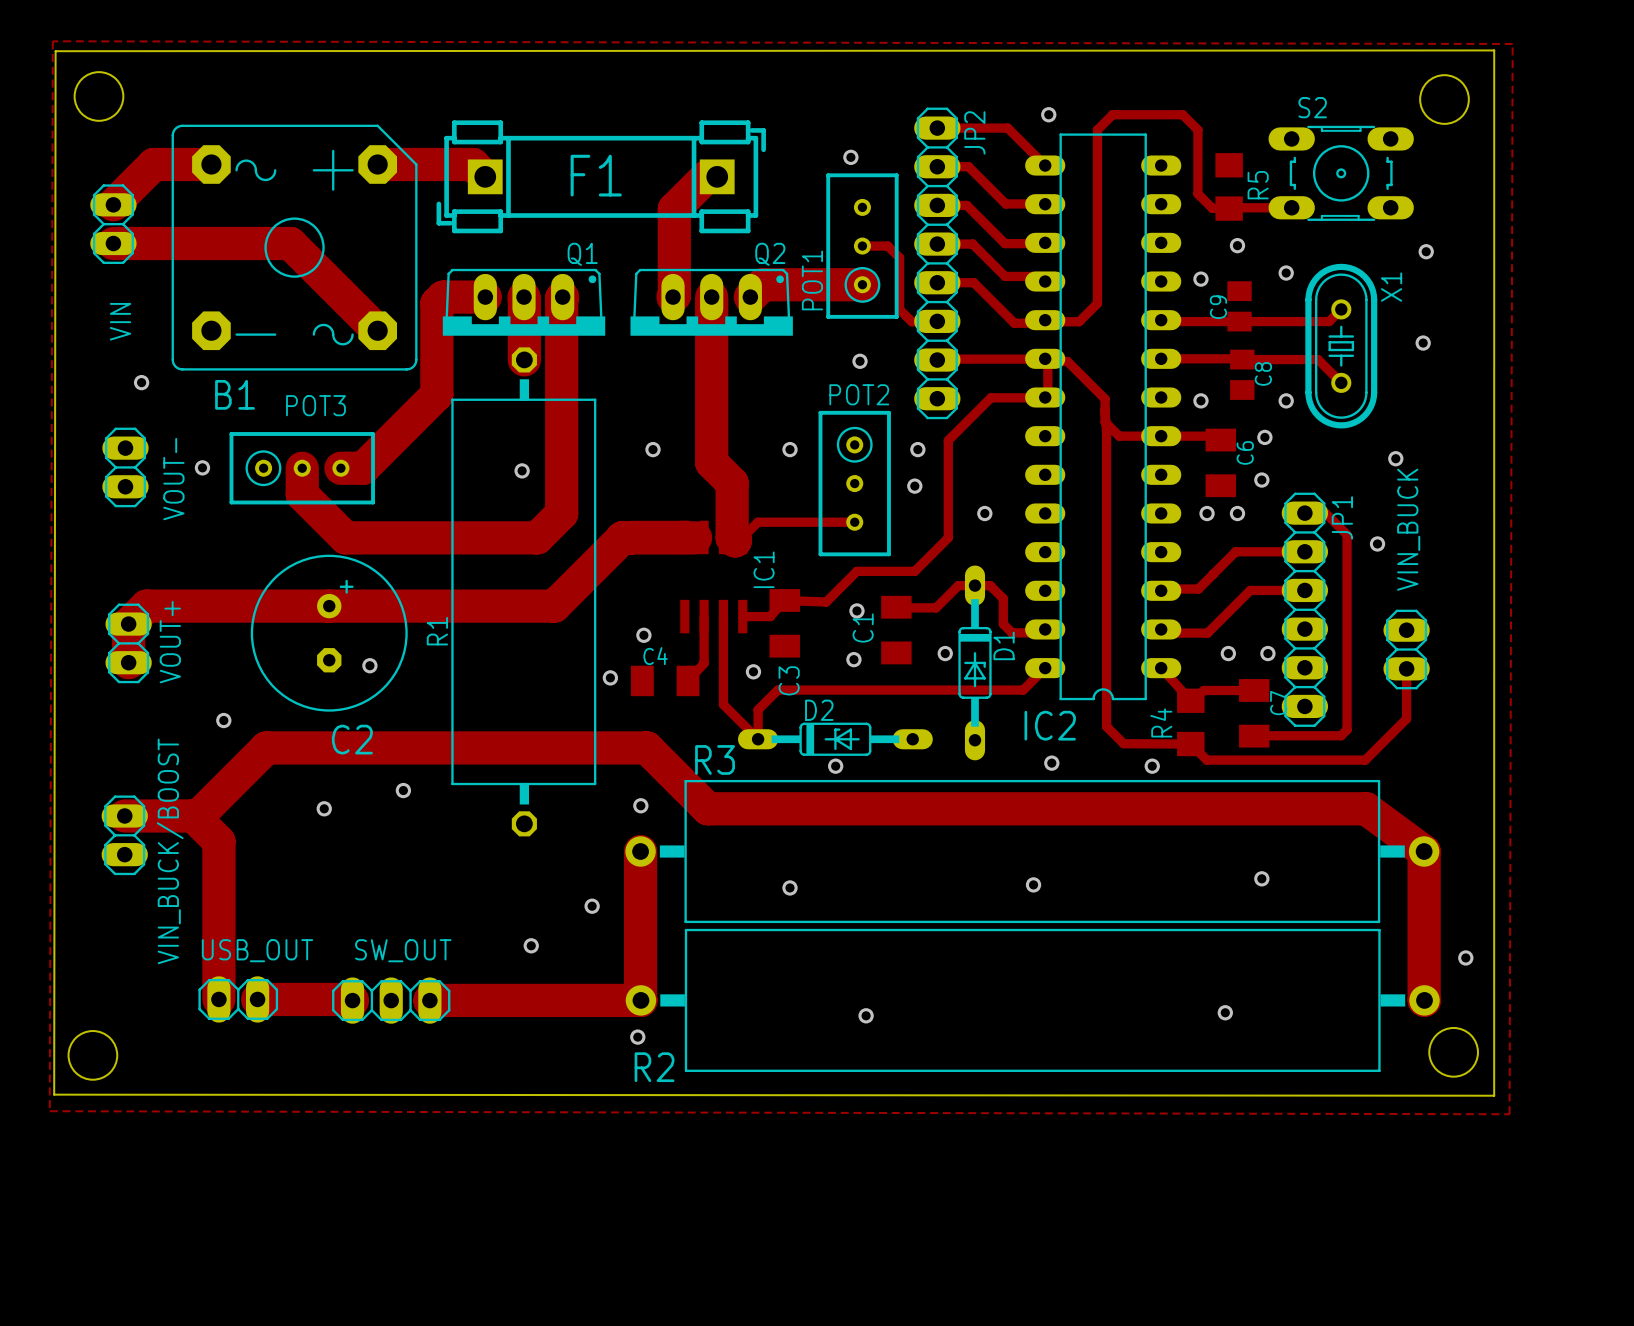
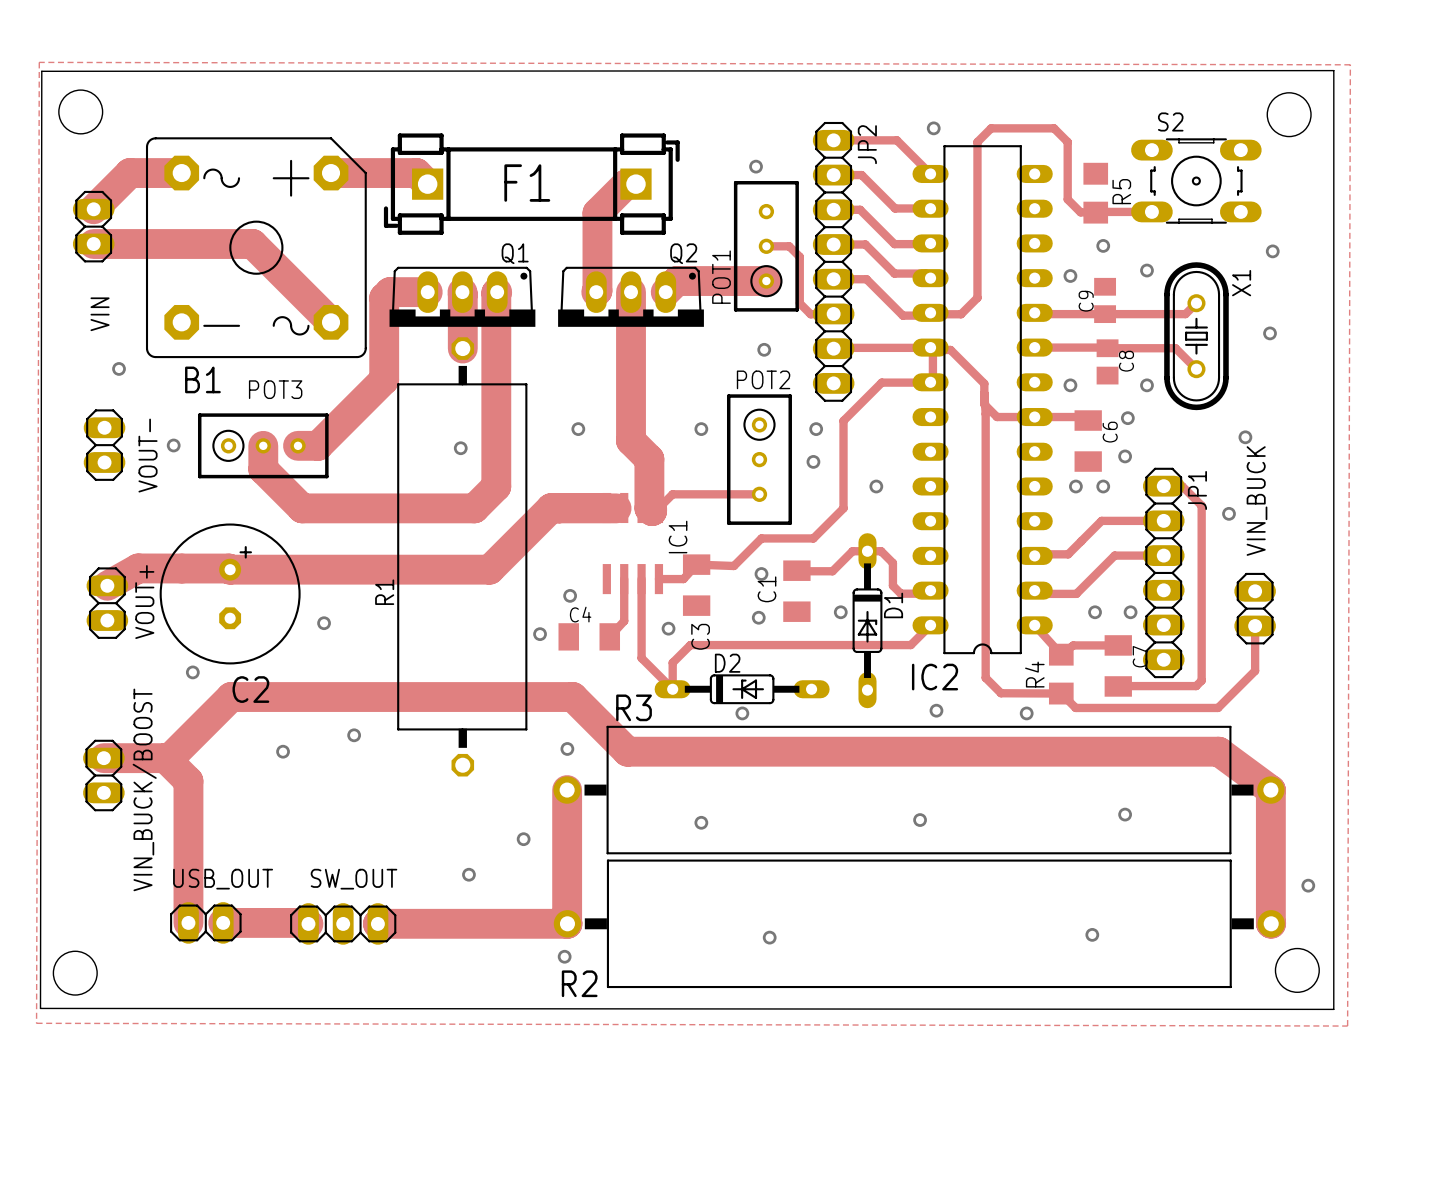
track: (265, 606) (146, 606) (128, 624) (128, 662) -> (230, 569) (138, 568) (107, 585)
C2 position: (329, 633) -> (230, 593)

